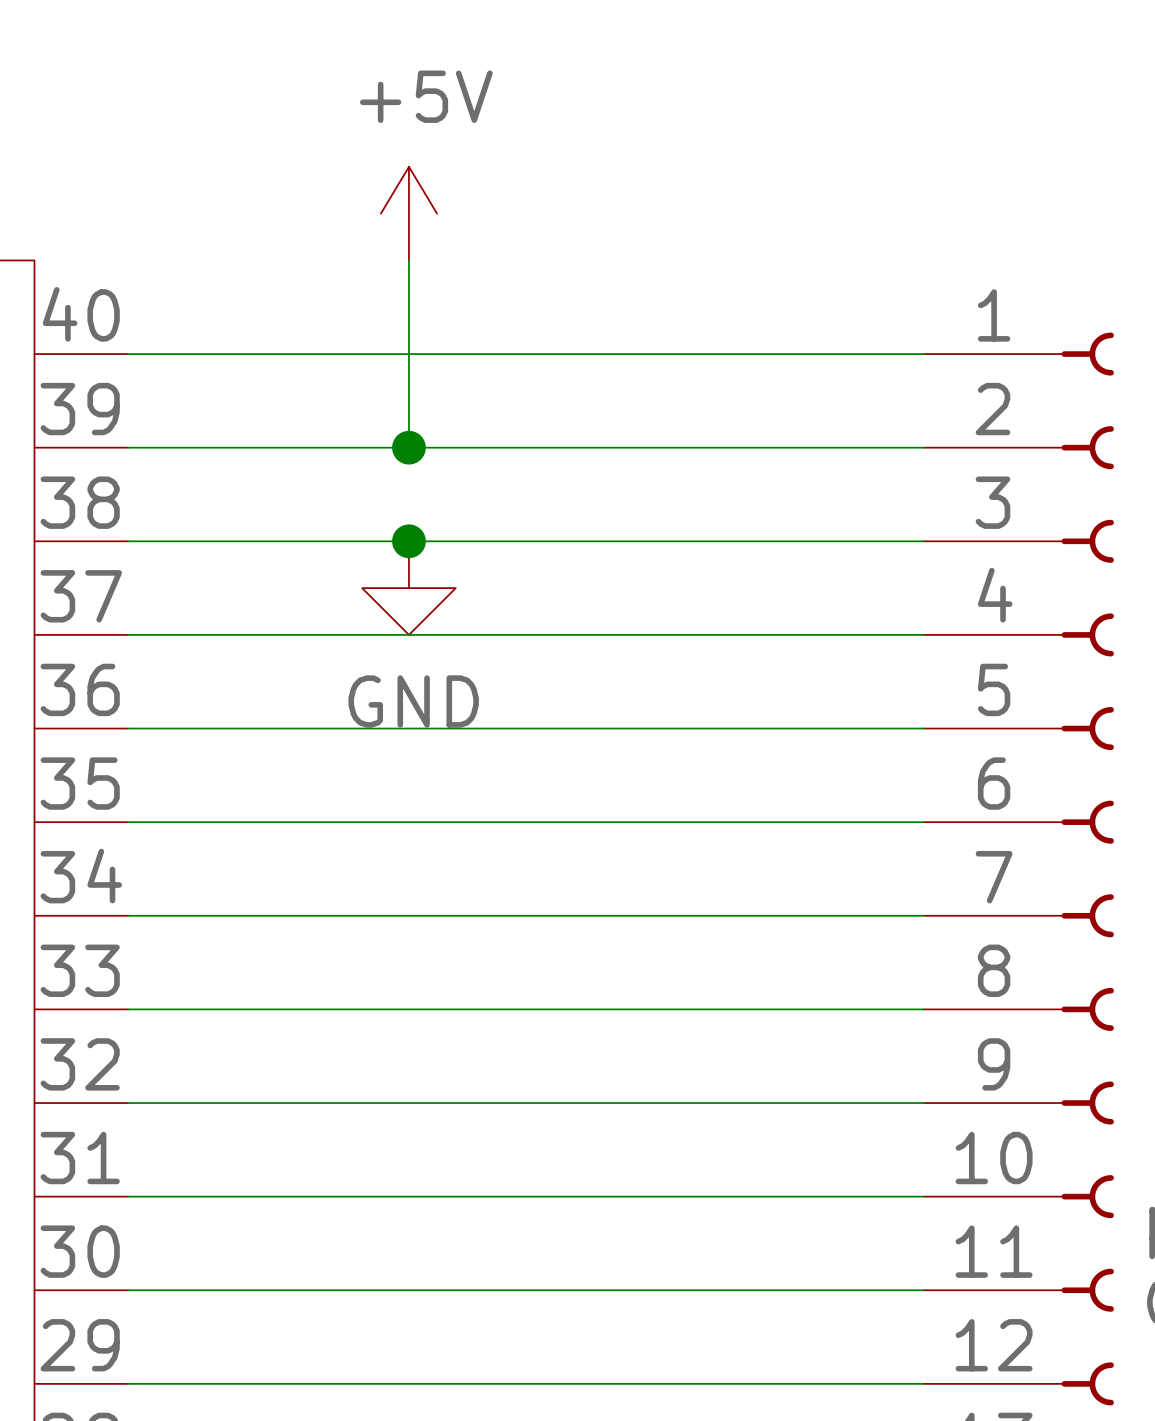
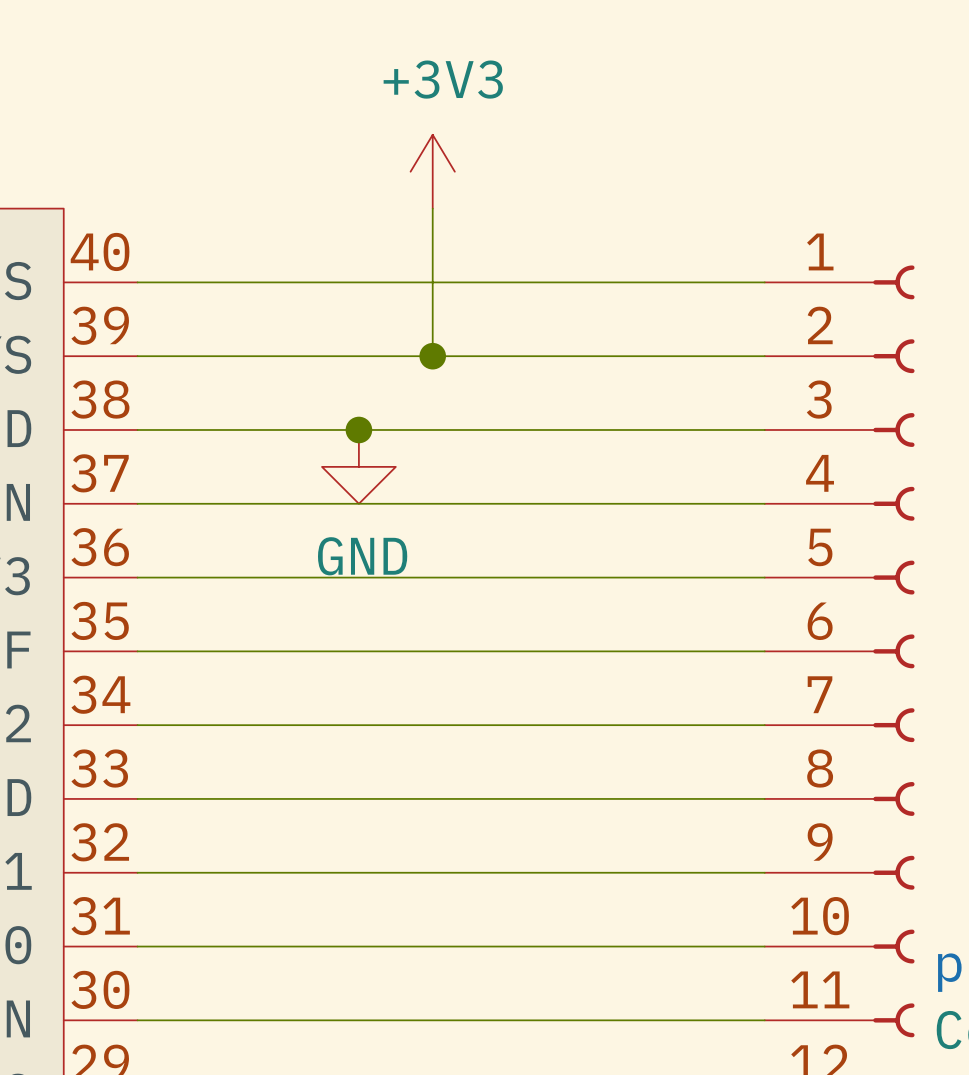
power symbol: +5V (408, 213) -> none
power symbol: none -> +3V3 (432, 171)
wire: (408, 260) (408, 447) -> (432, 208) (432, 356)
junction position: (408, 447) -> (432, 356)

